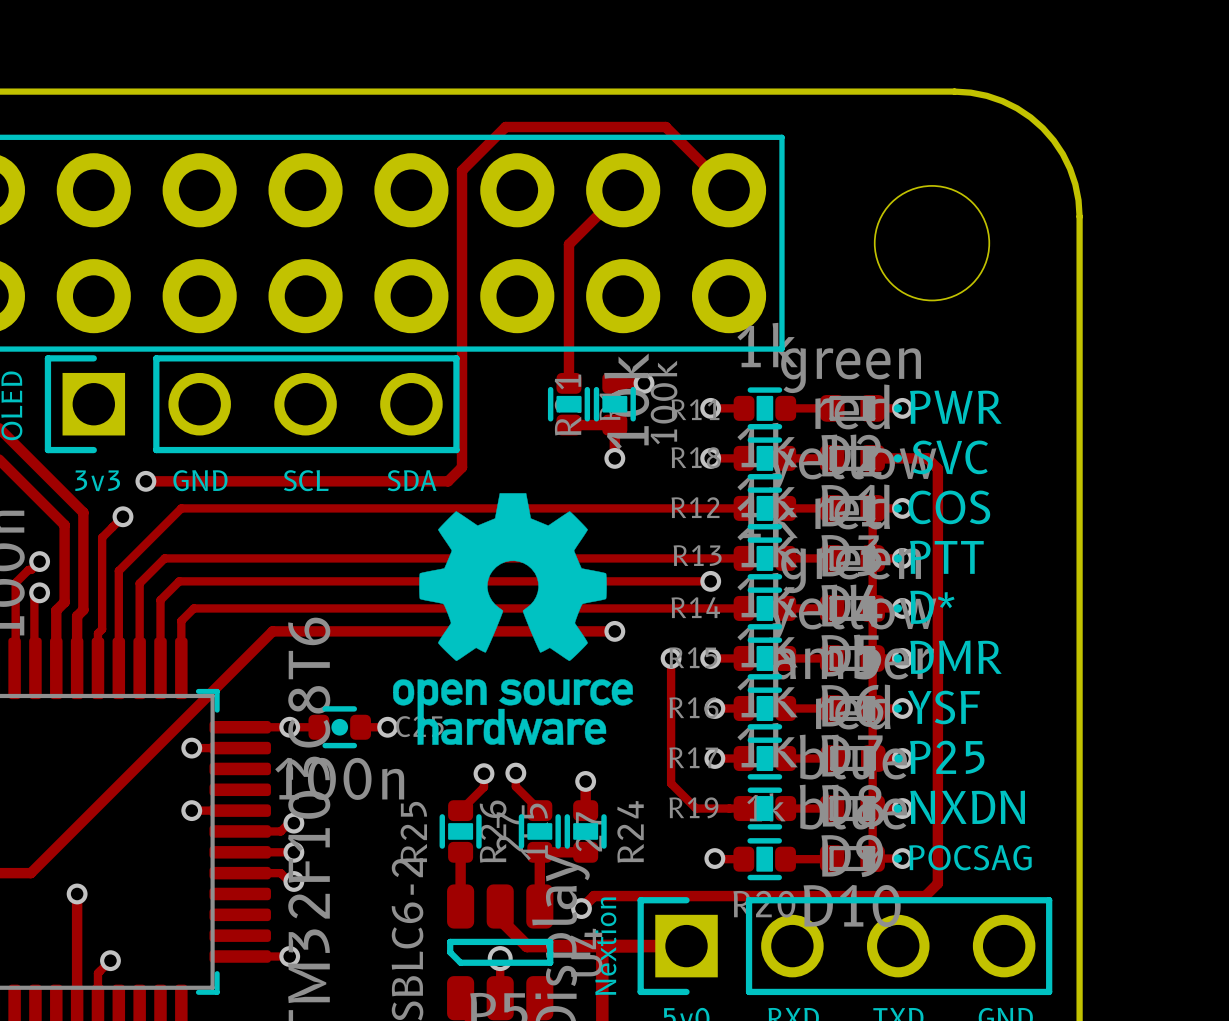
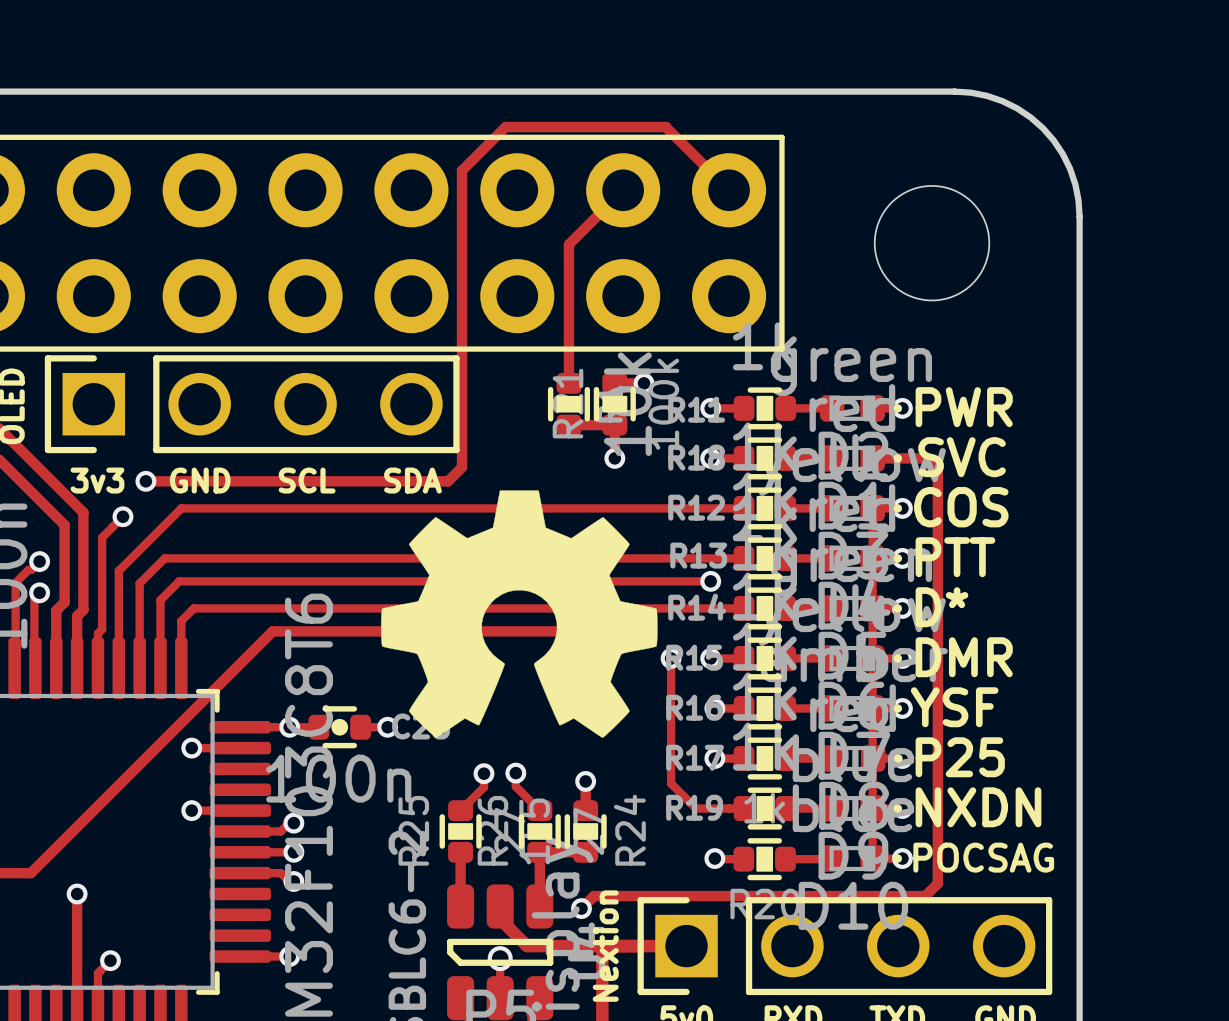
drawing shape: [393, 493, 633, 745] -> [381, 490, 658, 738]

